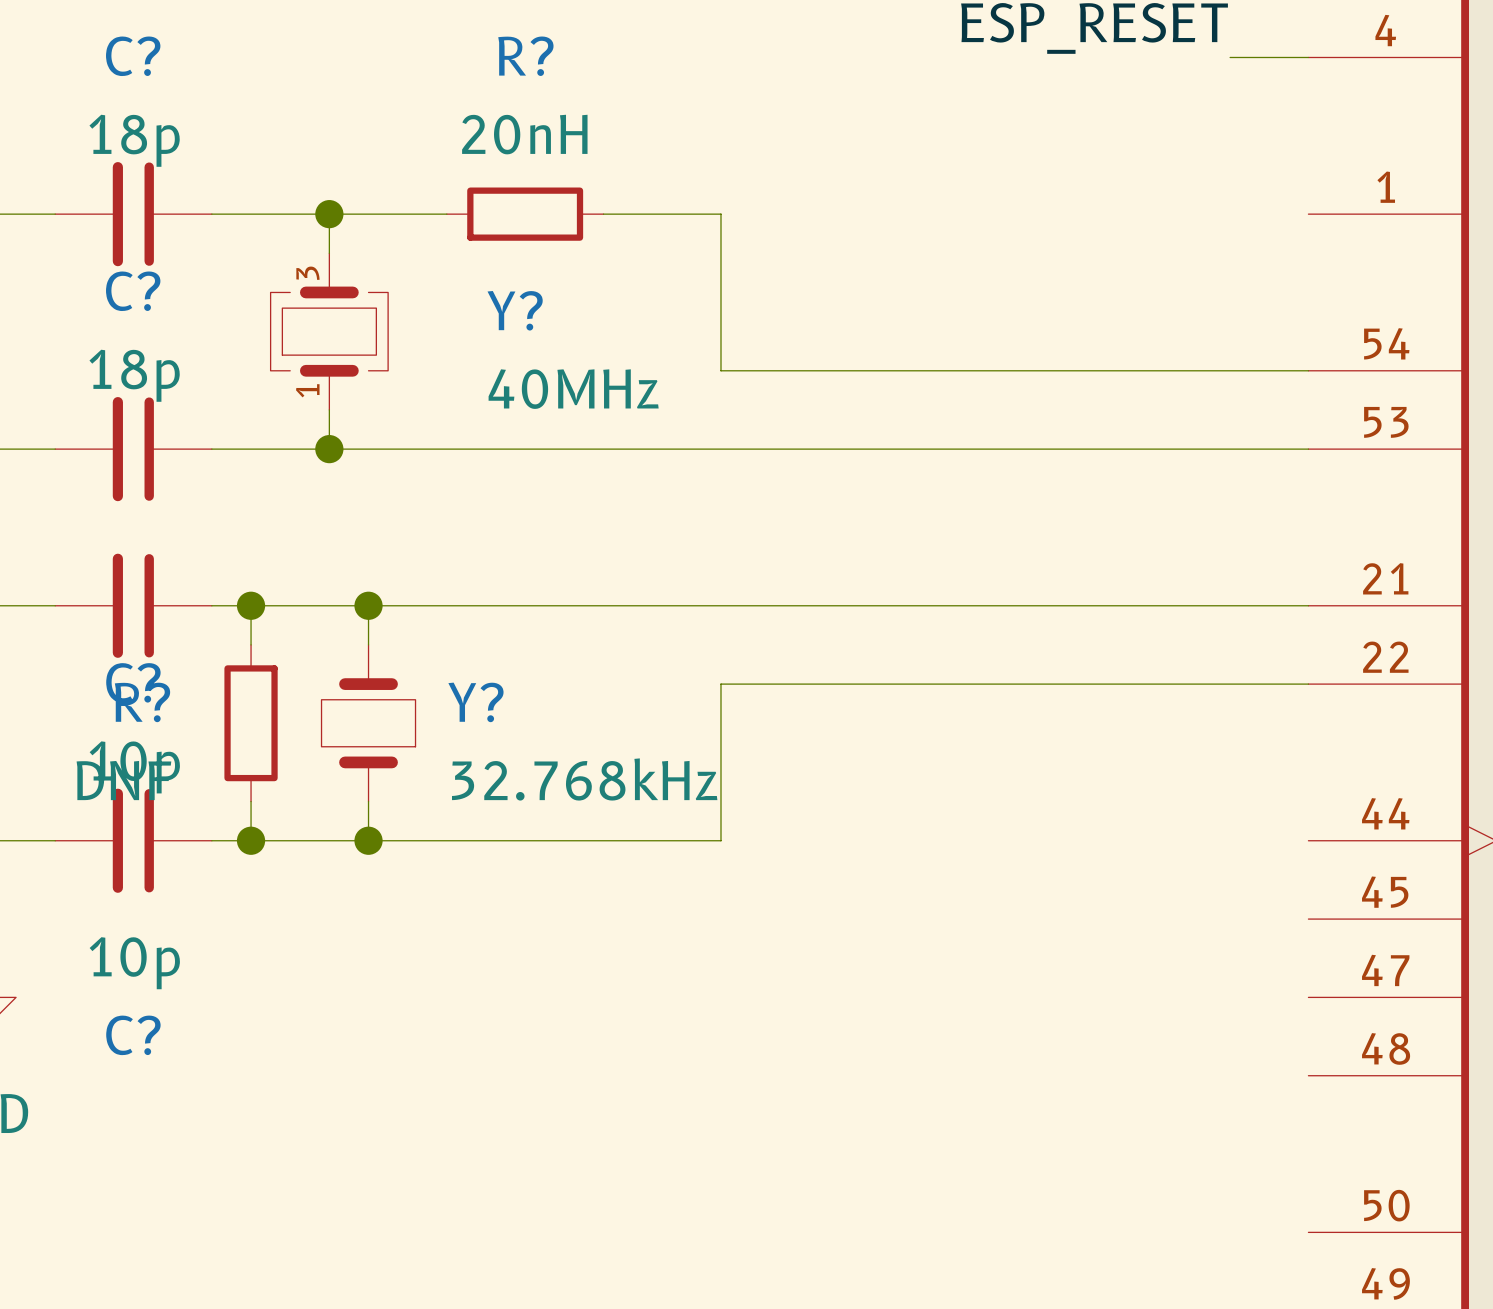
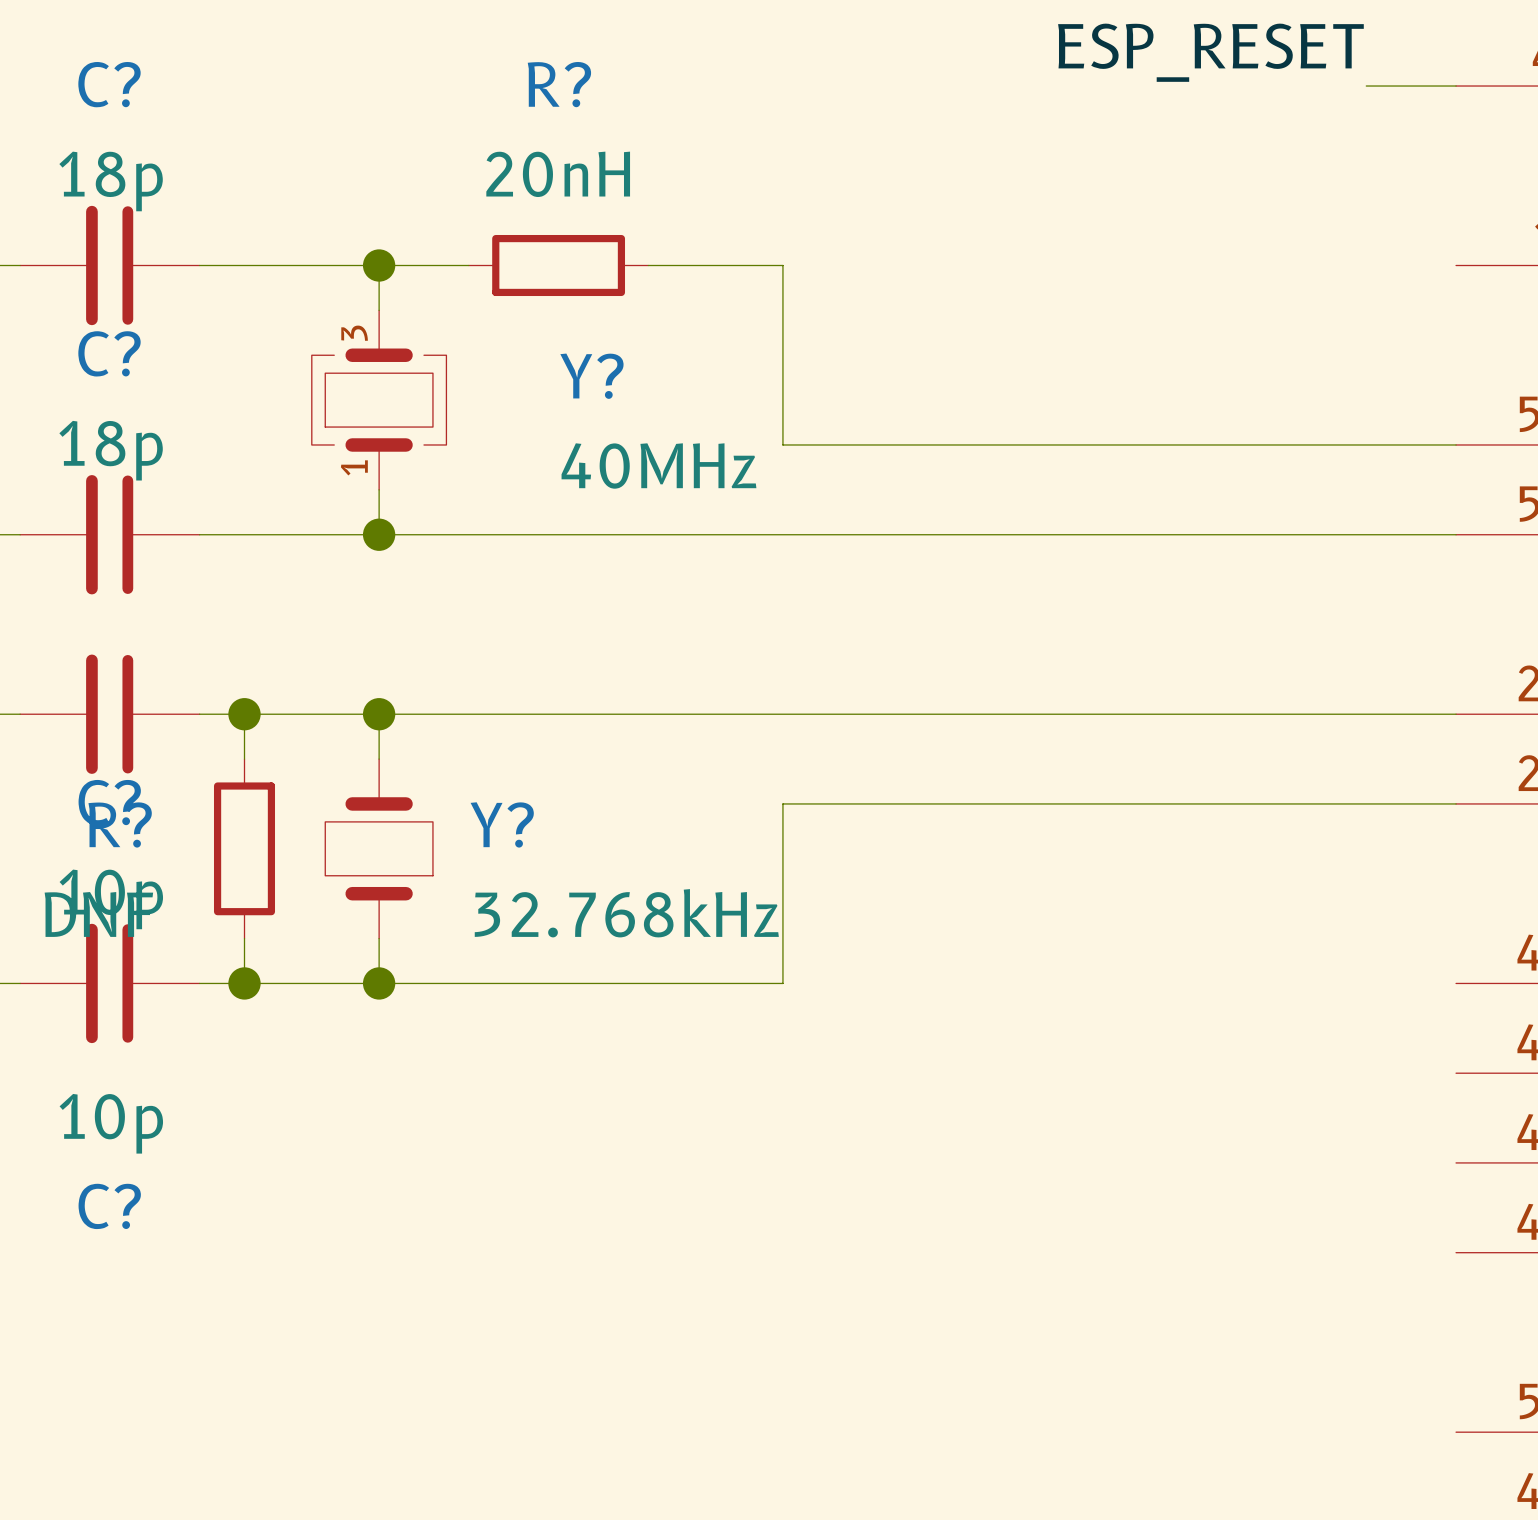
wire: (329, 214) (329, 253) -> (379, 265) (379, 310)
junction position: (329, 214) -> (379, 265)
Y? position: (329, 331) -> (379, 400)
wire: (329, 409) (329, 449) -> (379, 489) (379, 534)
junction position: (329, 449) -> (379, 534)

